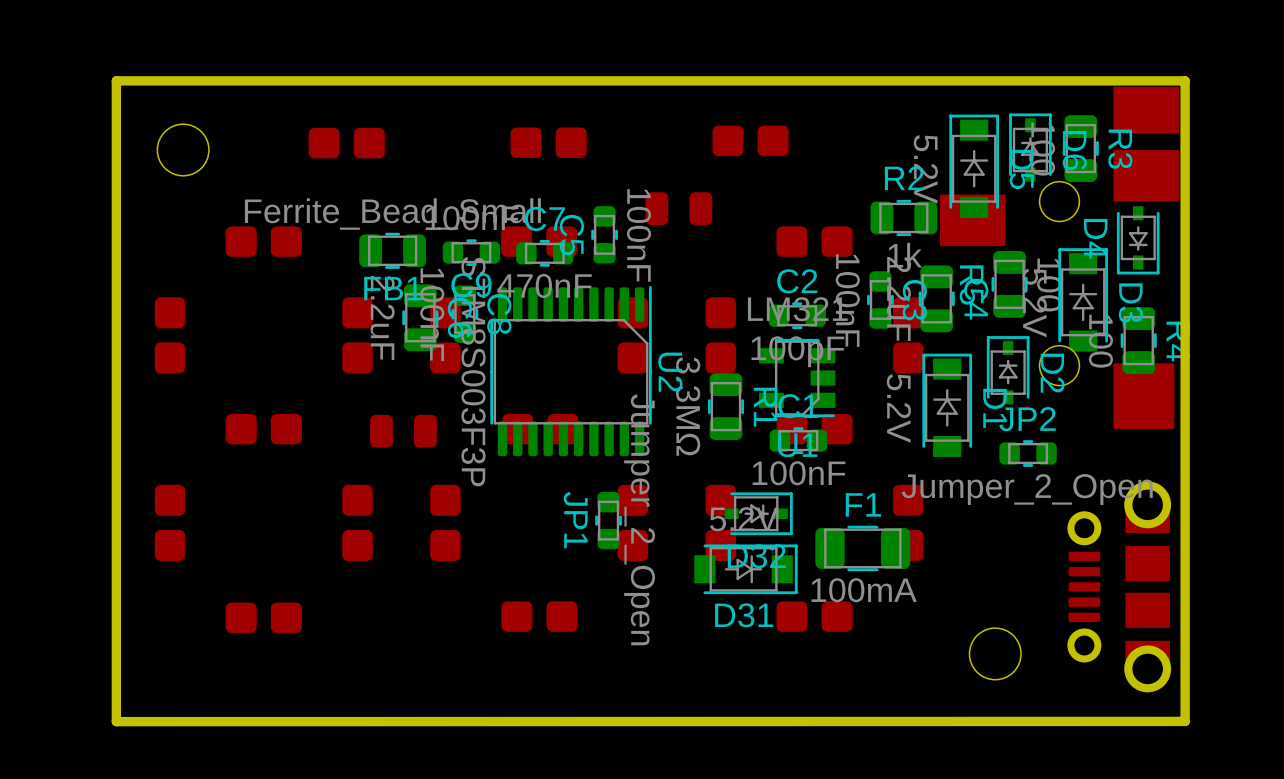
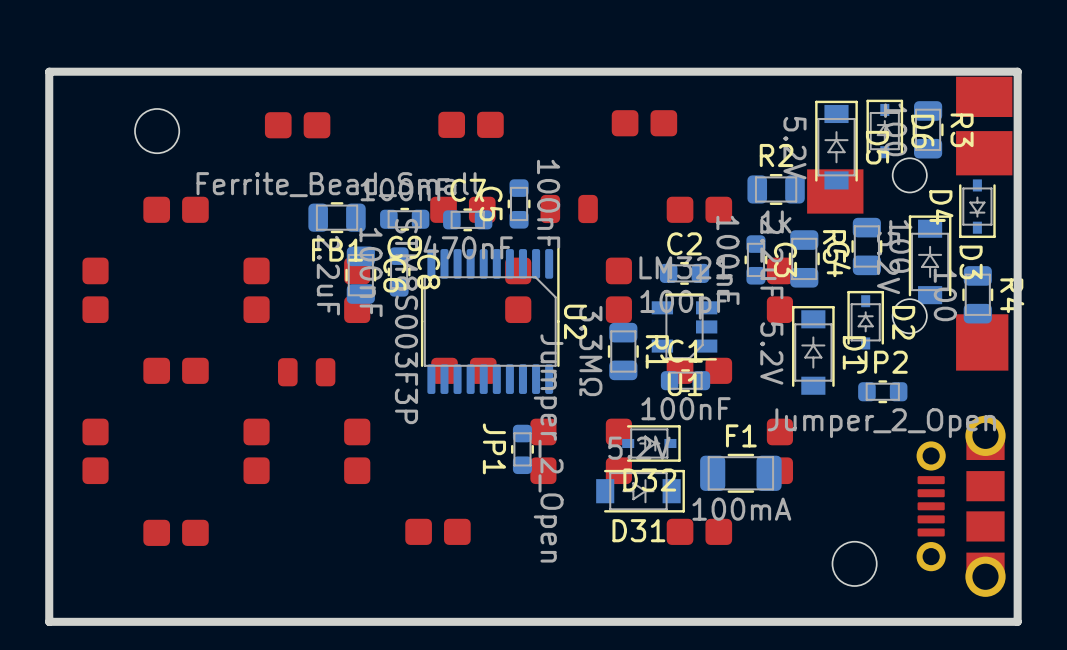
board edge: (116, 80) (116, 721) (1185, 721) -> (49, 621) (1017, 621)
board edge: none -> (99, 71) (49, 71) (49, 622)
part position: (678, 208) -> (569, 208)
part: none -> (176, 209)
part: (263, 241) -> none
part: none -> (95, 290)
part: (170, 335) -> none
part: none -> (256, 290)
part: (357, 335) -> none
part: none -> (357, 290)
part: (445, 335) -> none
part position: (632, 335) -> (518, 290)
part: none -> (176, 370)
part: (263, 429) -> none
part position: (403, 431) -> (306, 372)
part: none -> (95, 451)
part: (170, 522) -> none
part: none -> (256, 451)
part: (357, 522) -> none
part: none -> (357, 451)
part: (445, 522) -> none
part position: (539, 616) -> (437, 531)
part: none -> (176, 532)
part: (263, 617) -> none

